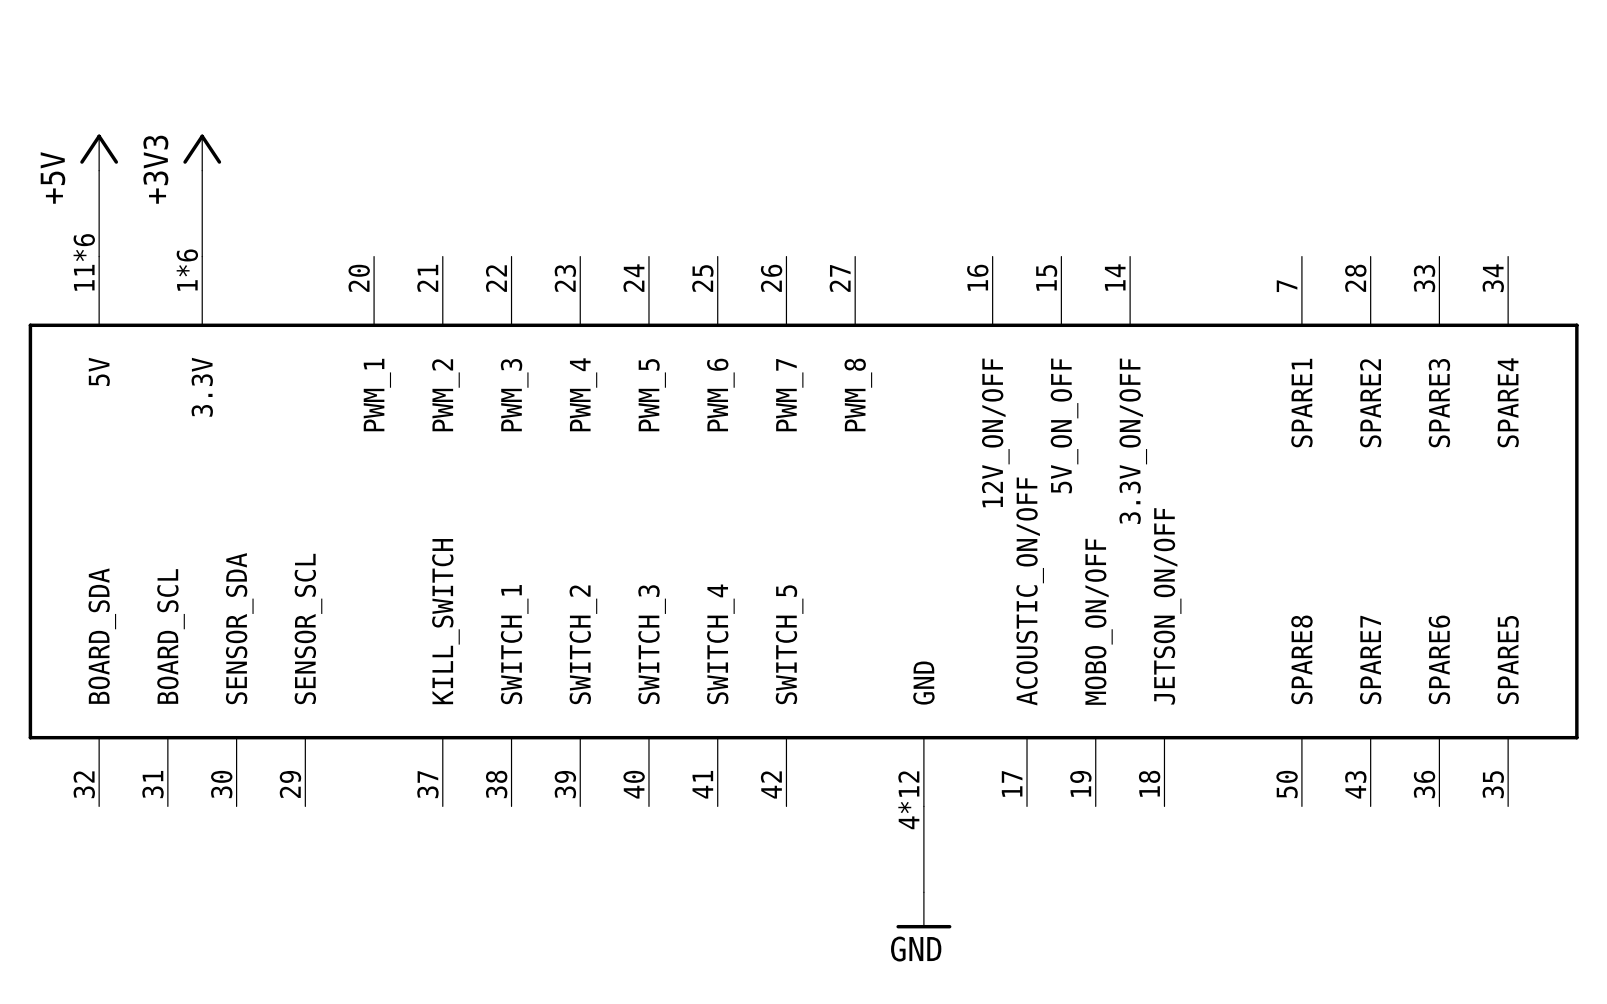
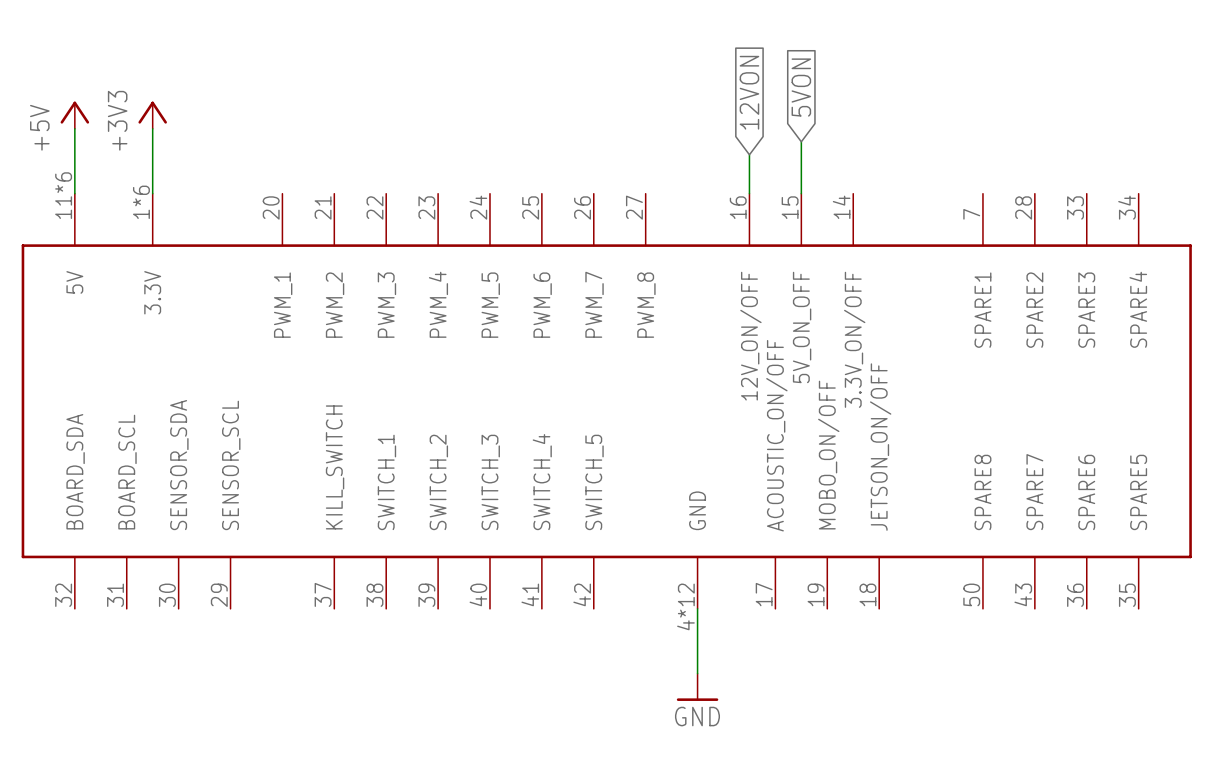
global label: none -> 5VON (801, 87)
global label: none -> 12VON (749, 92)
wire: none -> (801, 141) (801, 193)
wire: none -> (749, 154) (749, 193)

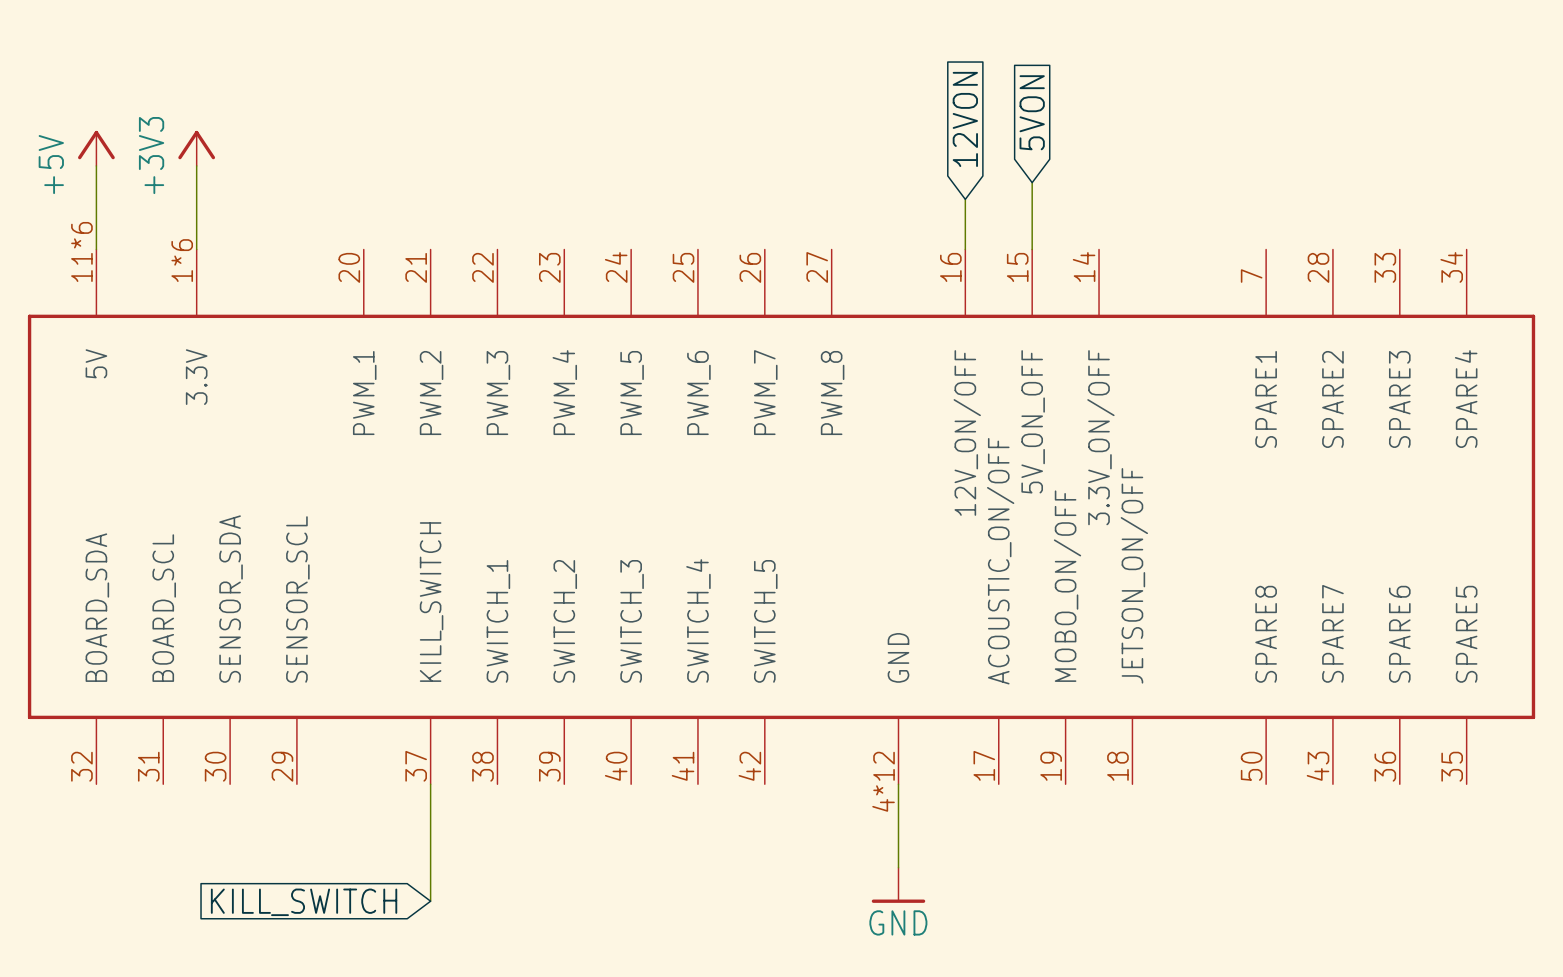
wire: none -> (430, 784) (430, 901)
global label: none -> KILL_SWITCH (304, 902)

